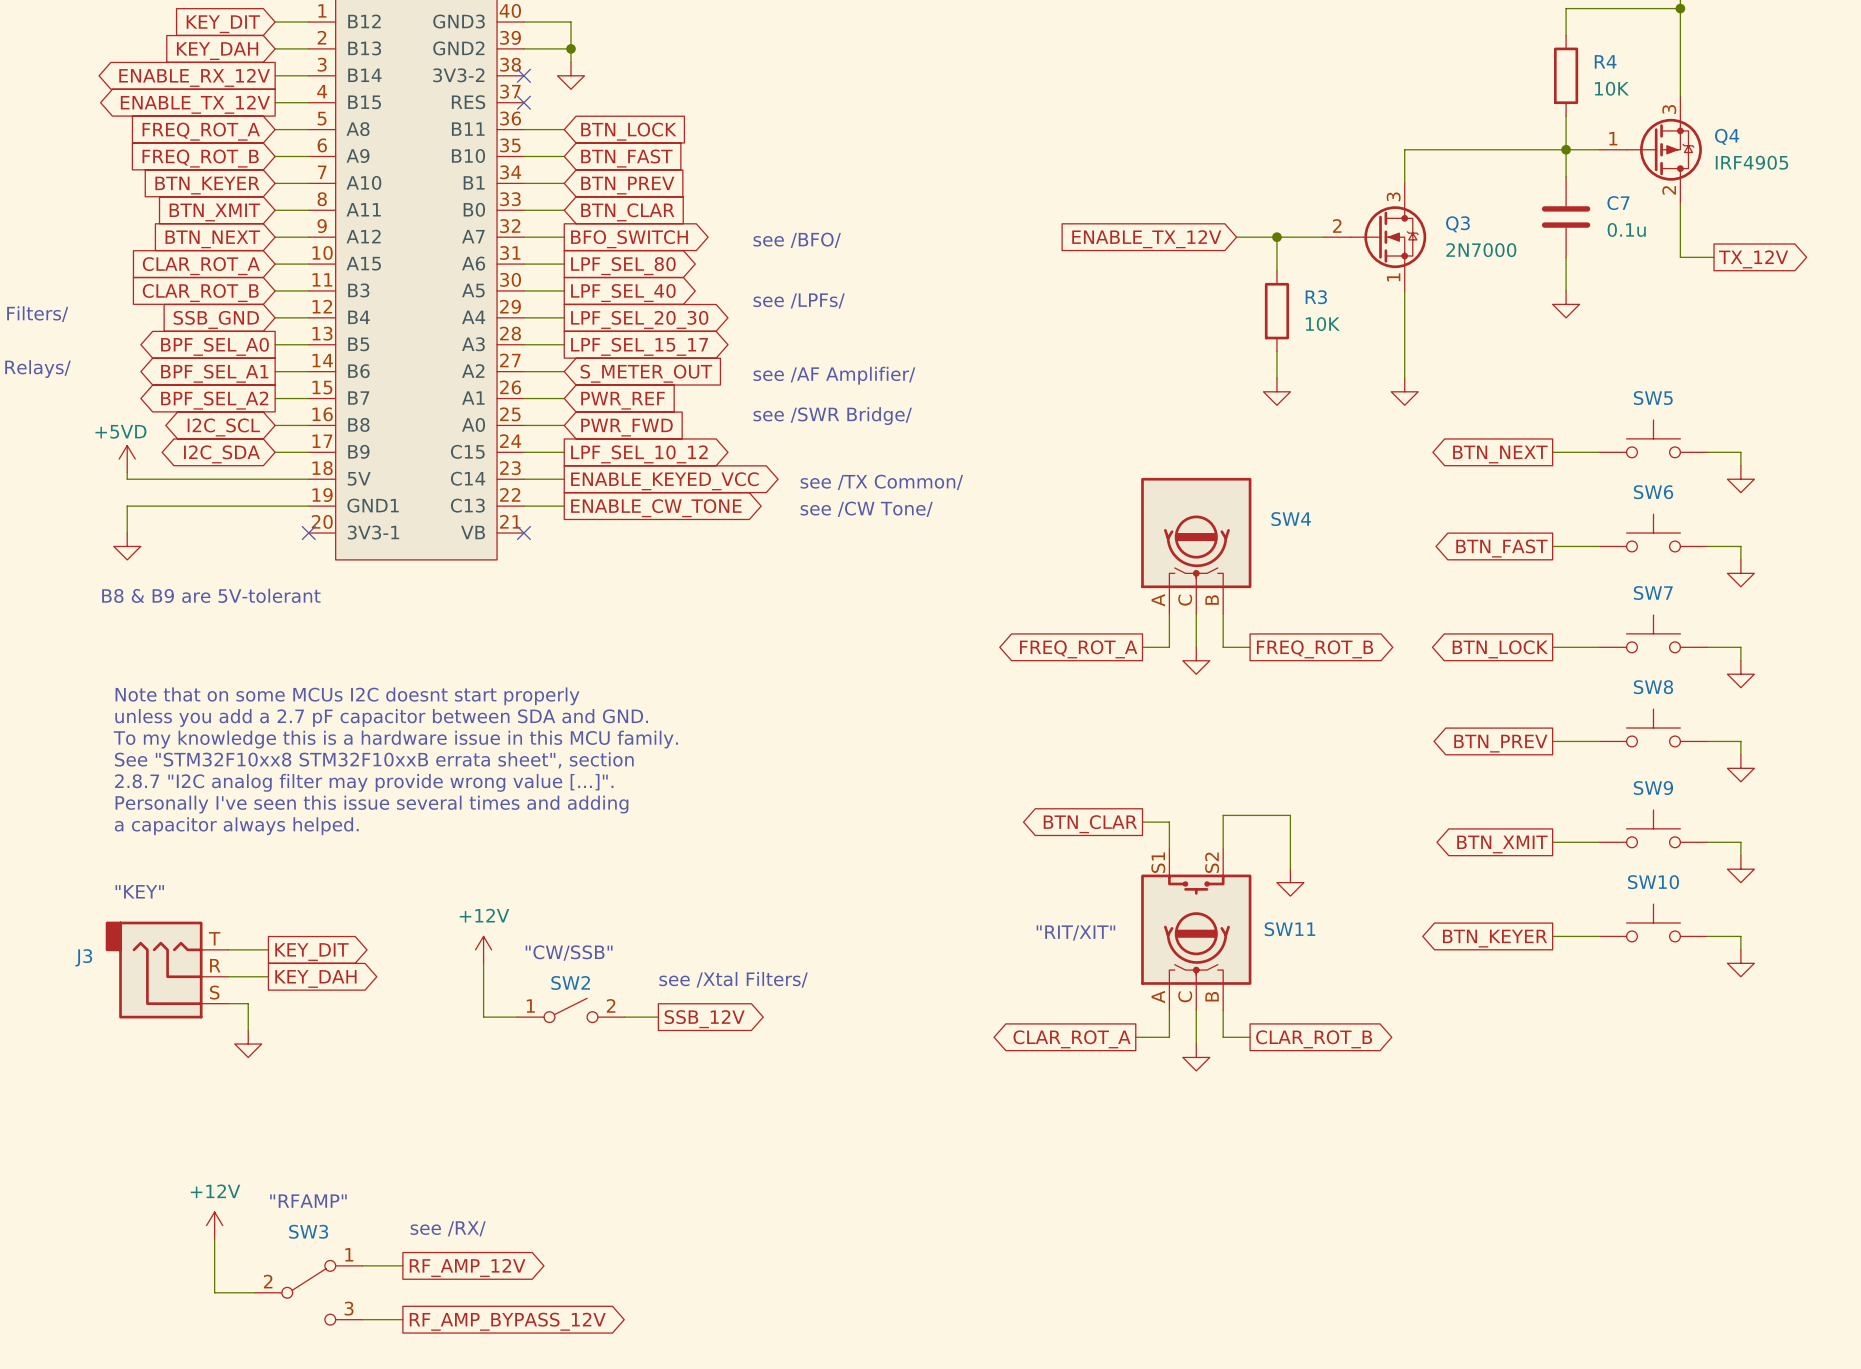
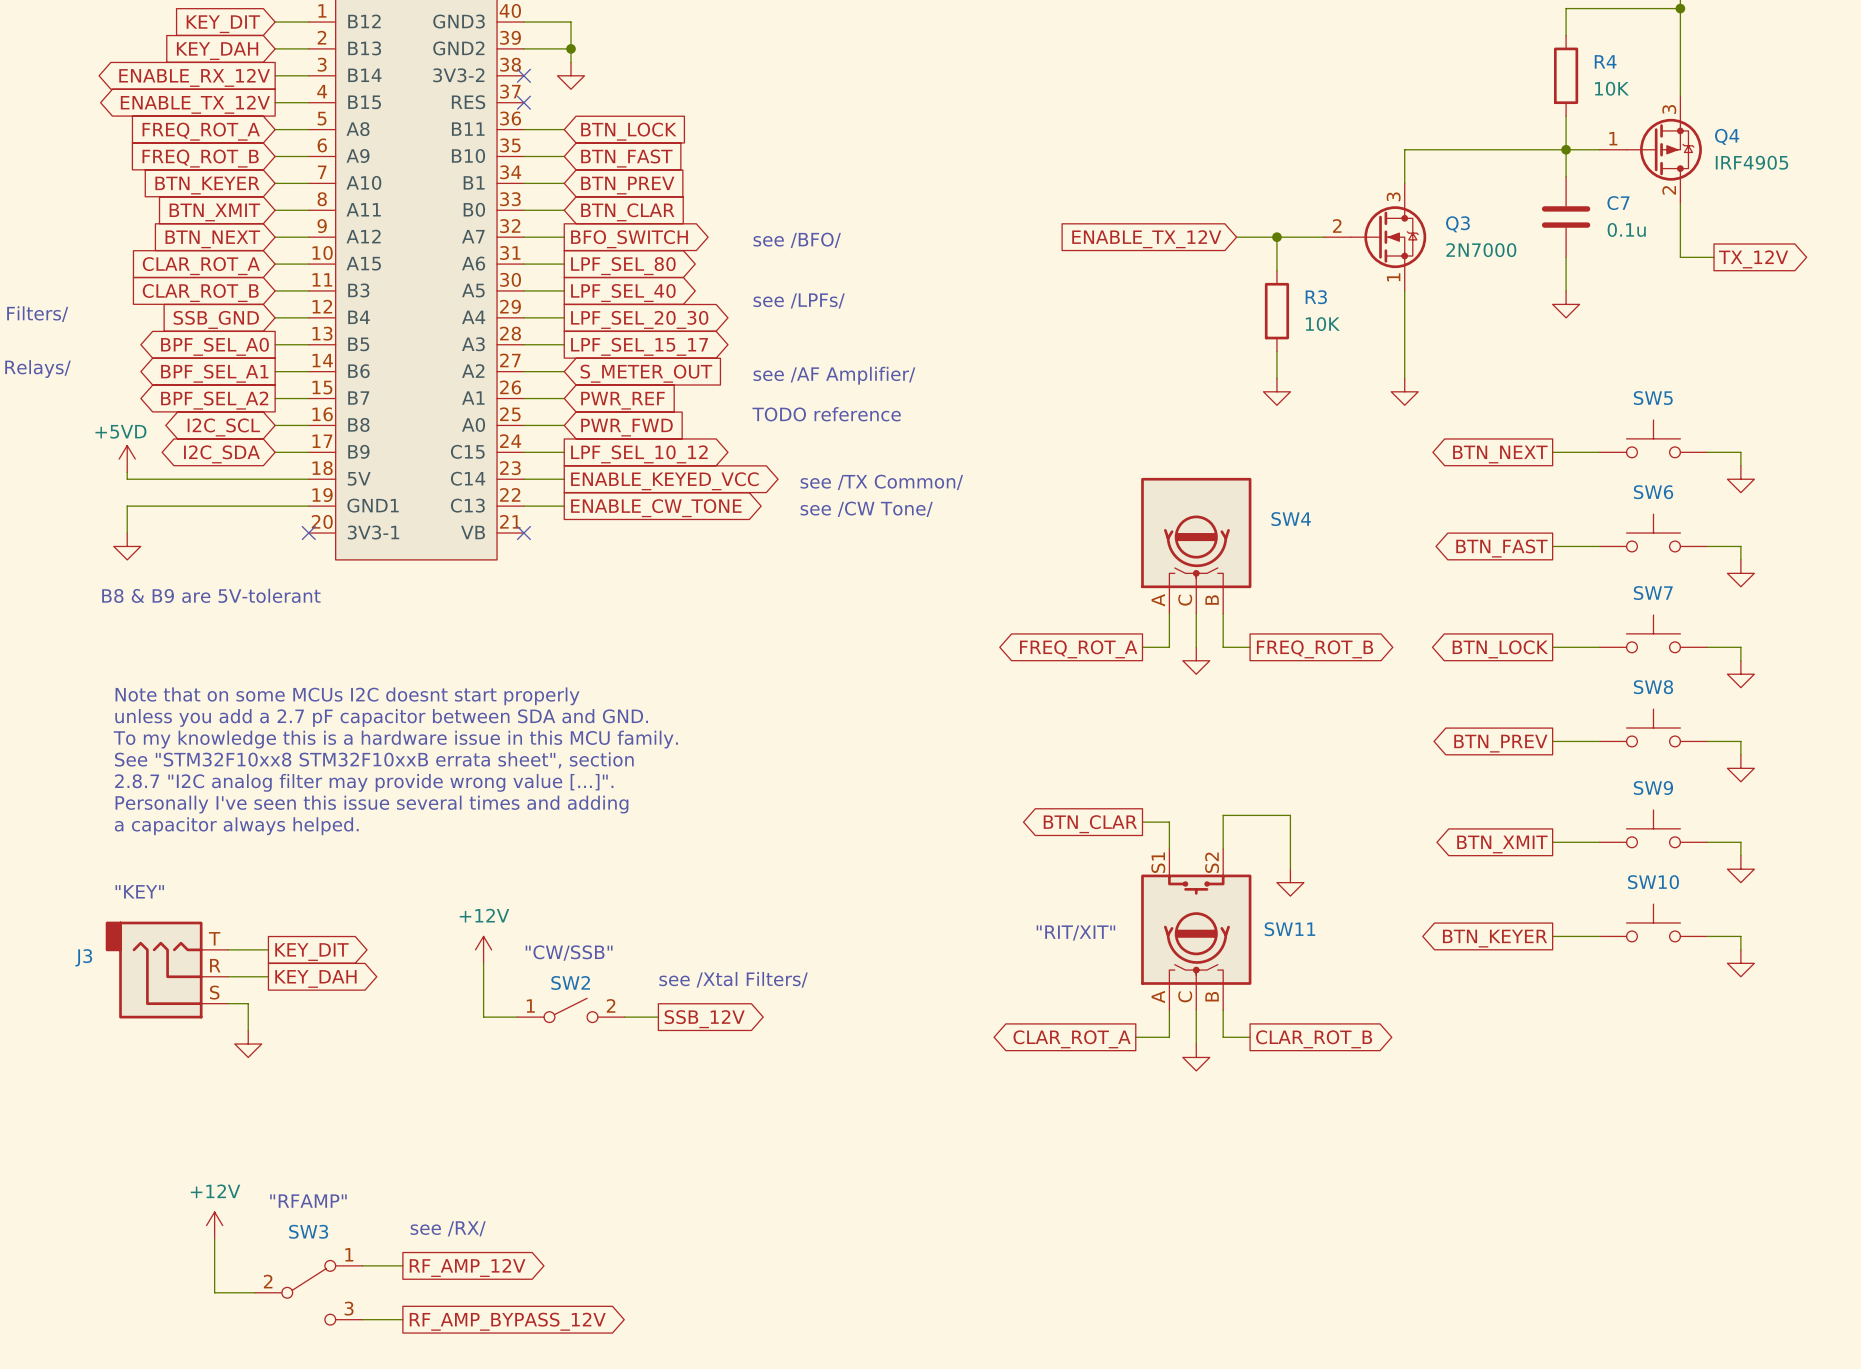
text: see /SWR Bridge/ (832, 416) -> TODO reference (826, 414)

